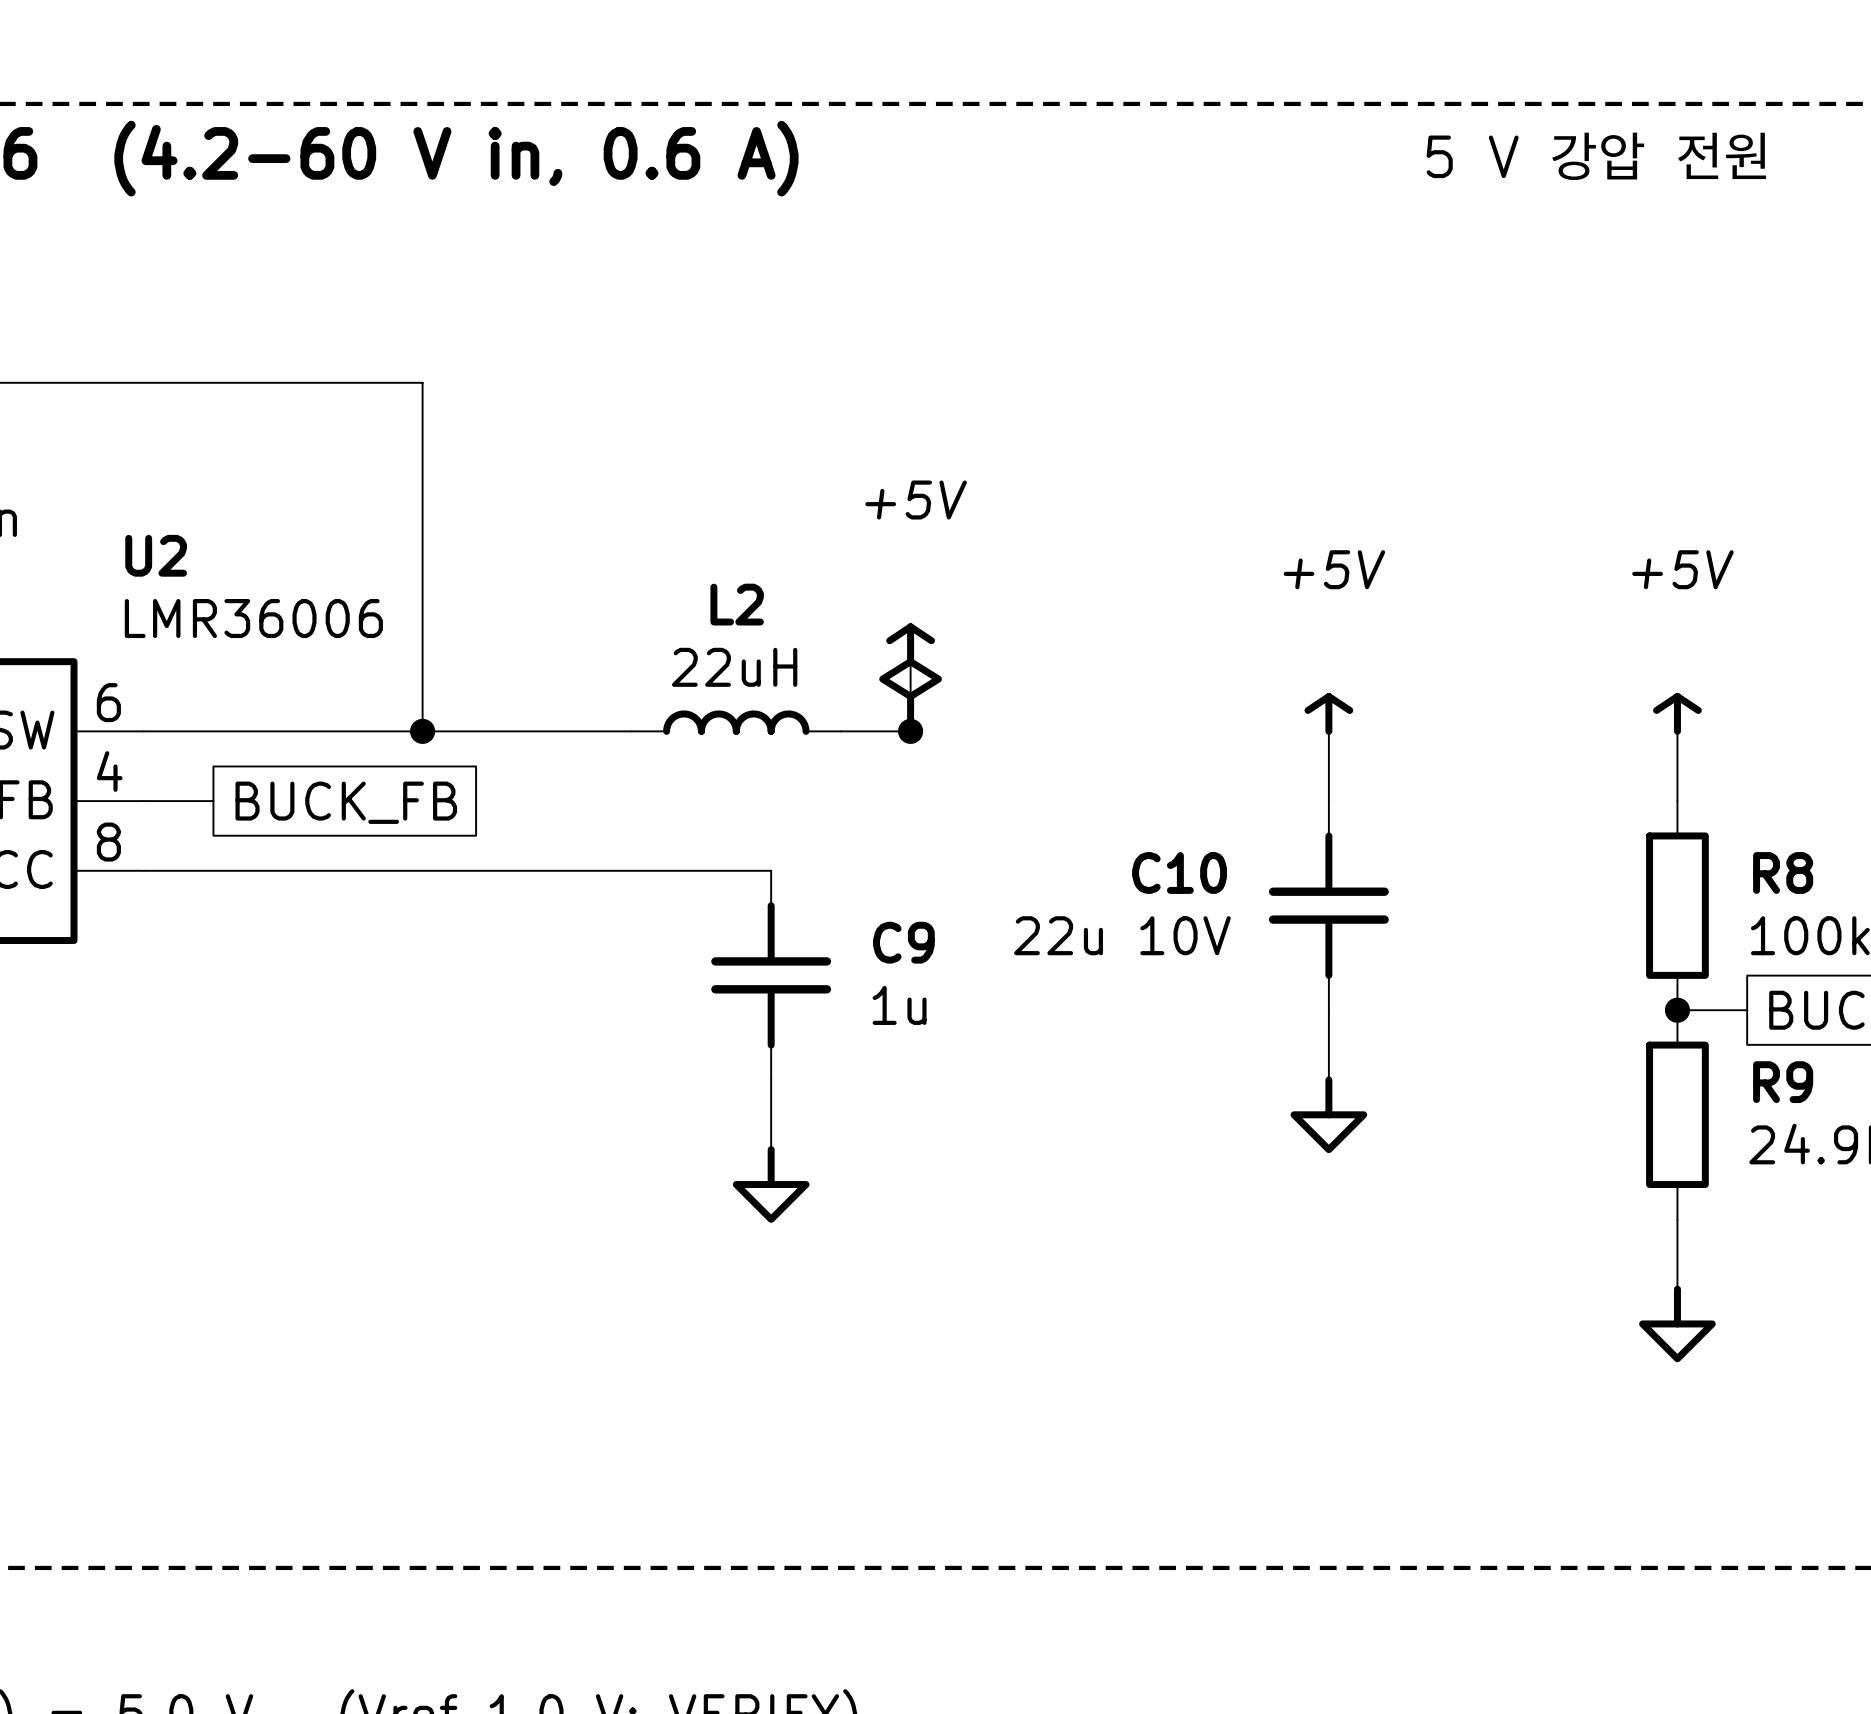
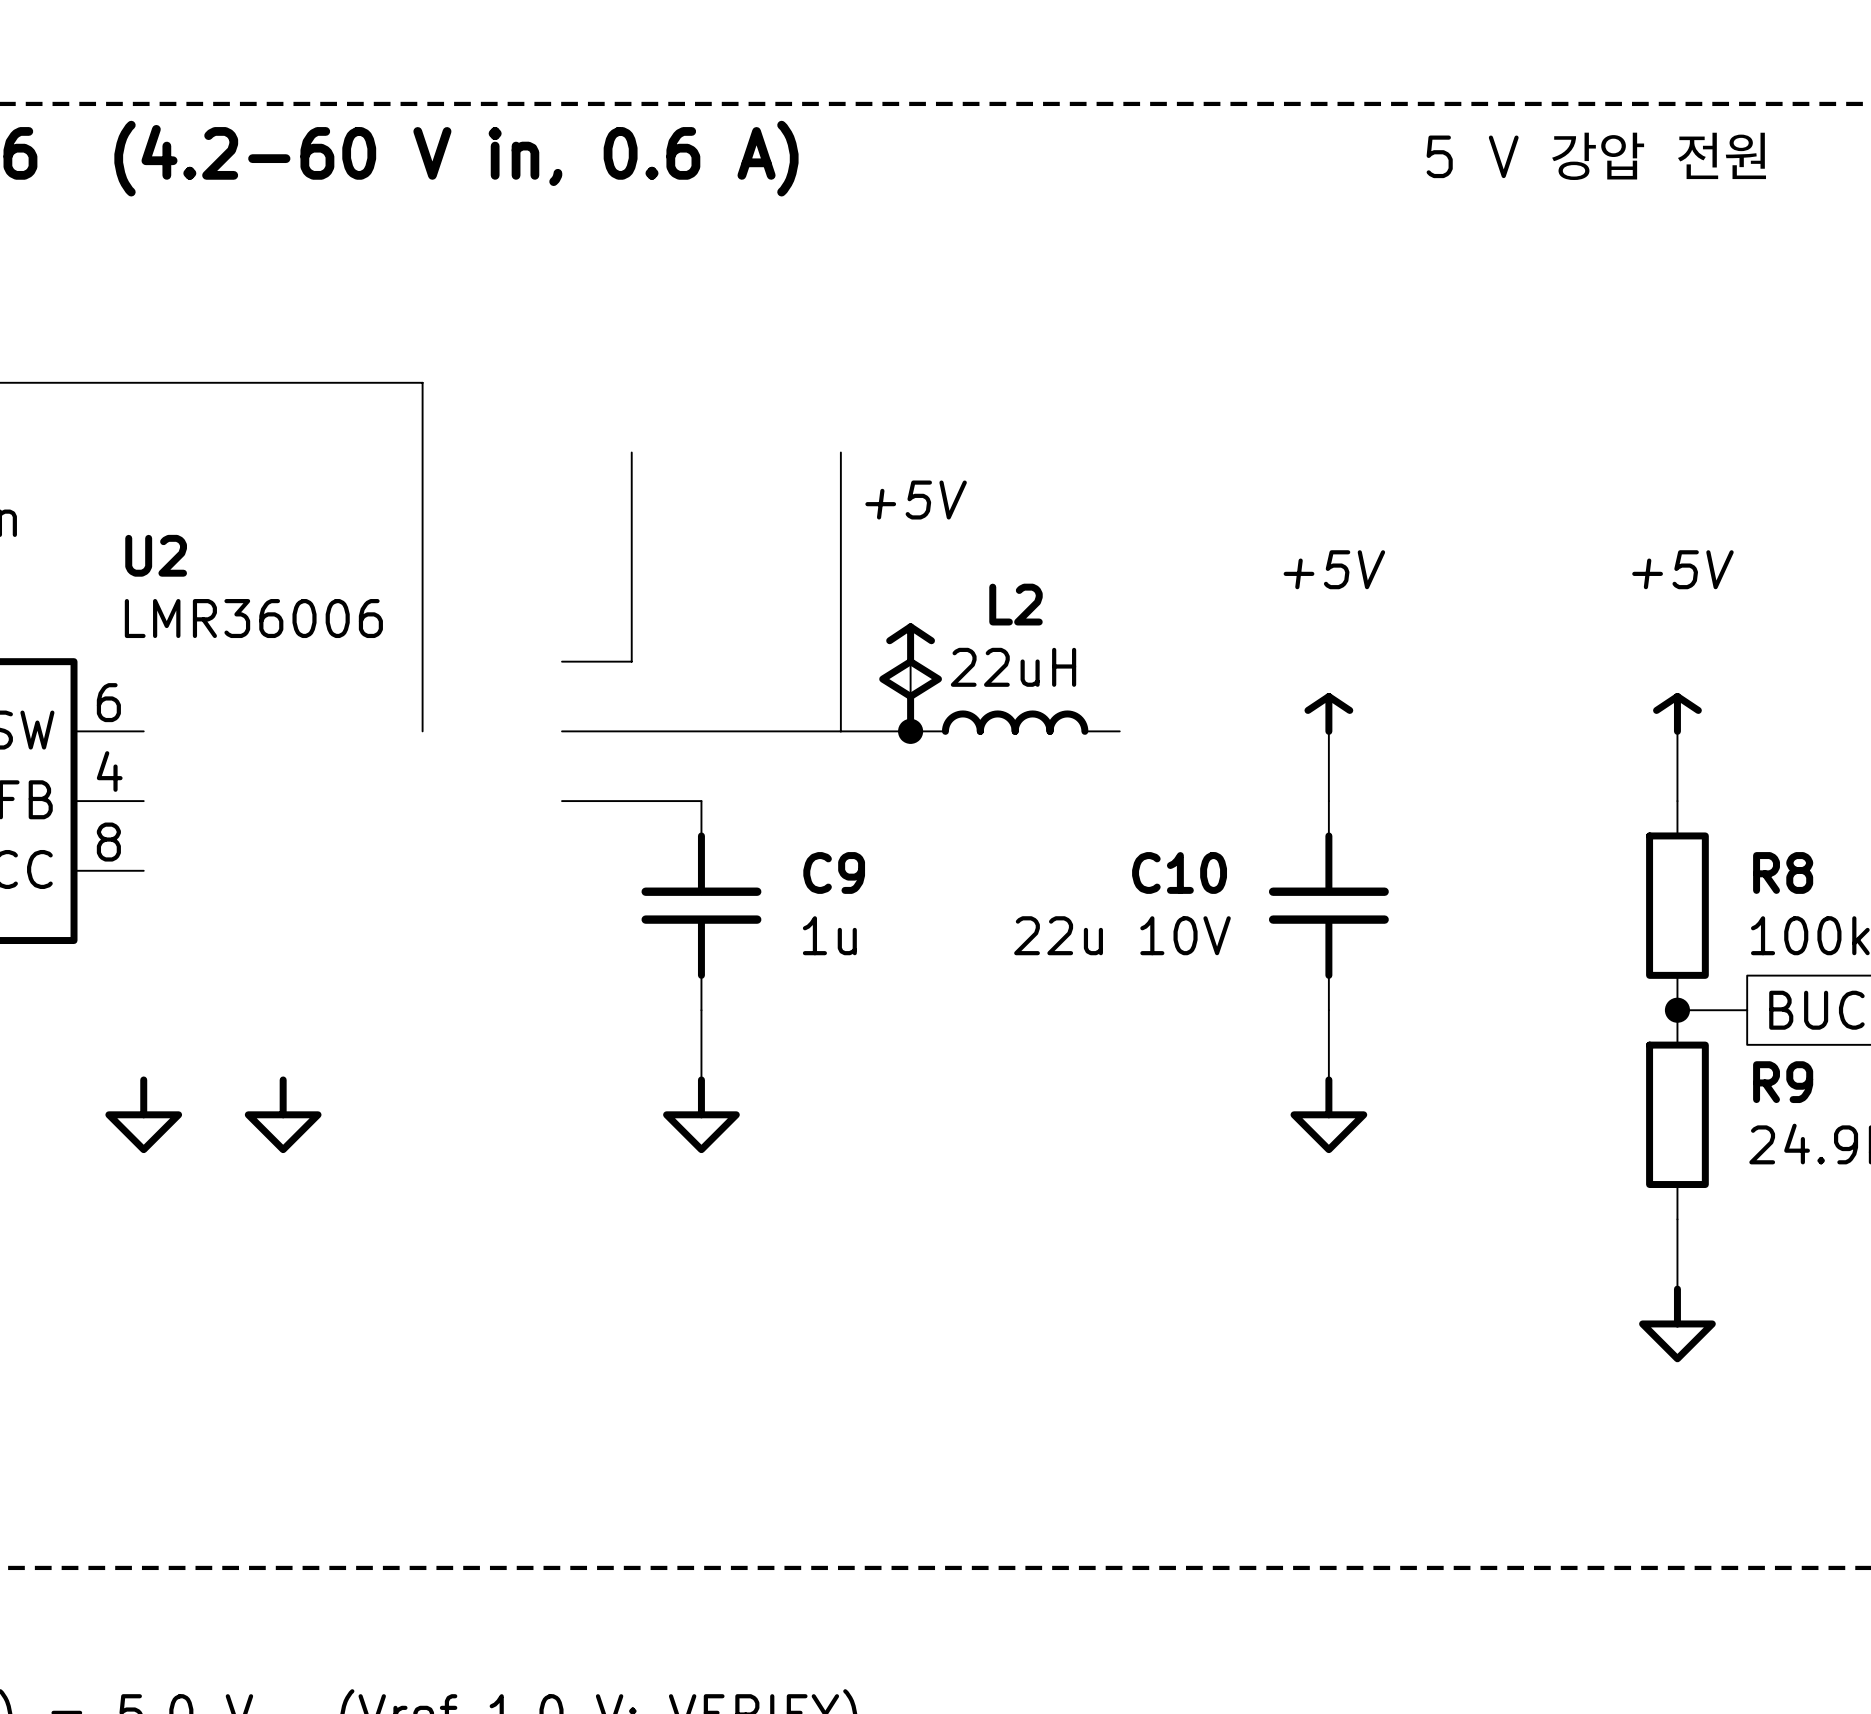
wire: none -> (631, 452) (631, 661) (562, 661)
wire: none -> (840, 452) (840, 731) (631, 731)
L2 position: (736, 722) -> (1015, 722)
wire: (143, 731) (562, 731) -> none
junction: (422, 731) -> none
wire: (143, 801) (213, 801) -> none
wire: none -> (562, 801) (701, 801)
global label: BUCK_FB (346, 802) -> none
wire: (143, 870) (771, 870) -> none
C9 position: (771, 975) -> (701, 905)
wire: (771, 1079) (771, 1149) -> (701, 1010) (701, 1079)
power symbol: none -> (143, 1114)
power symbol: none -> (283, 1114)
power symbol position: (771, 1184) -> (701, 1114)

